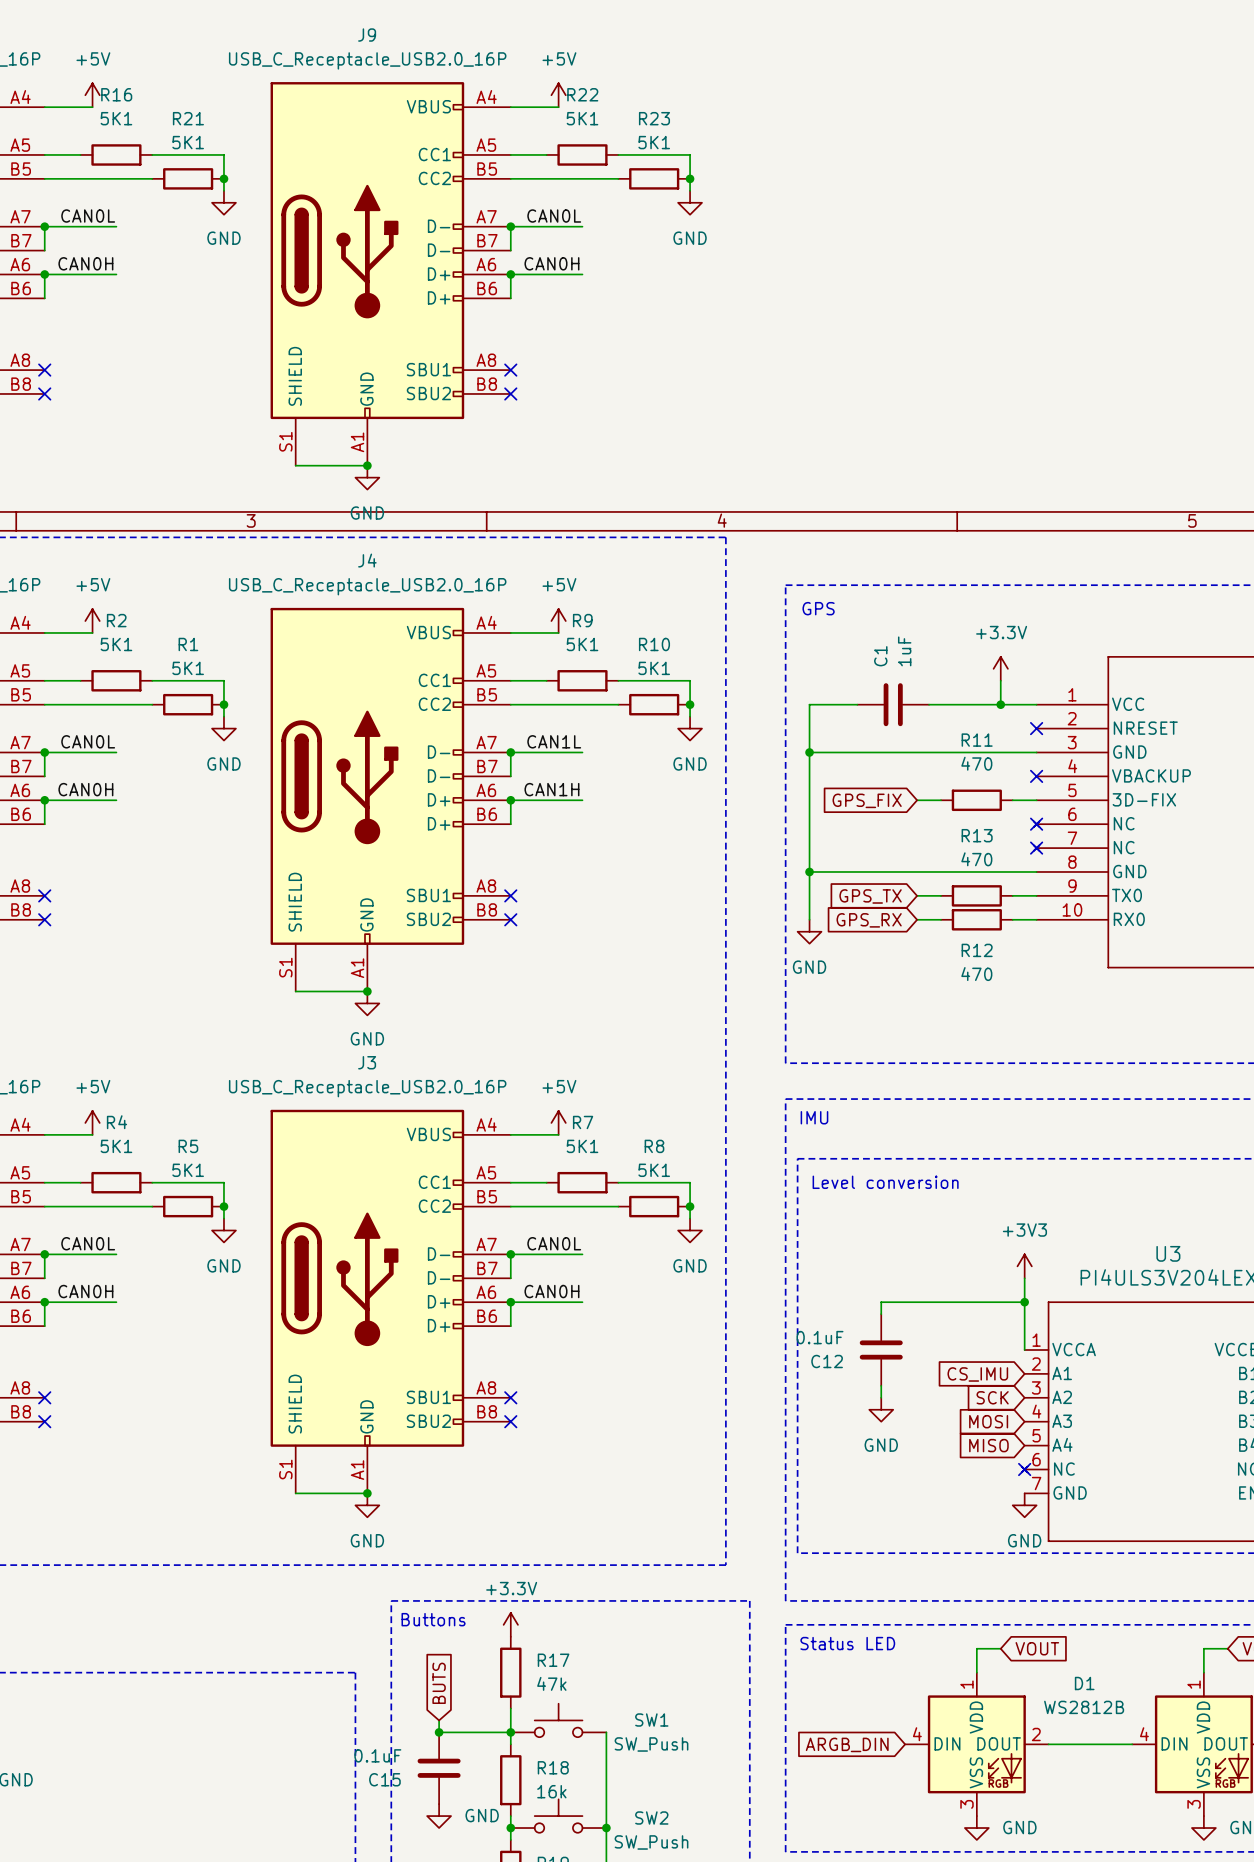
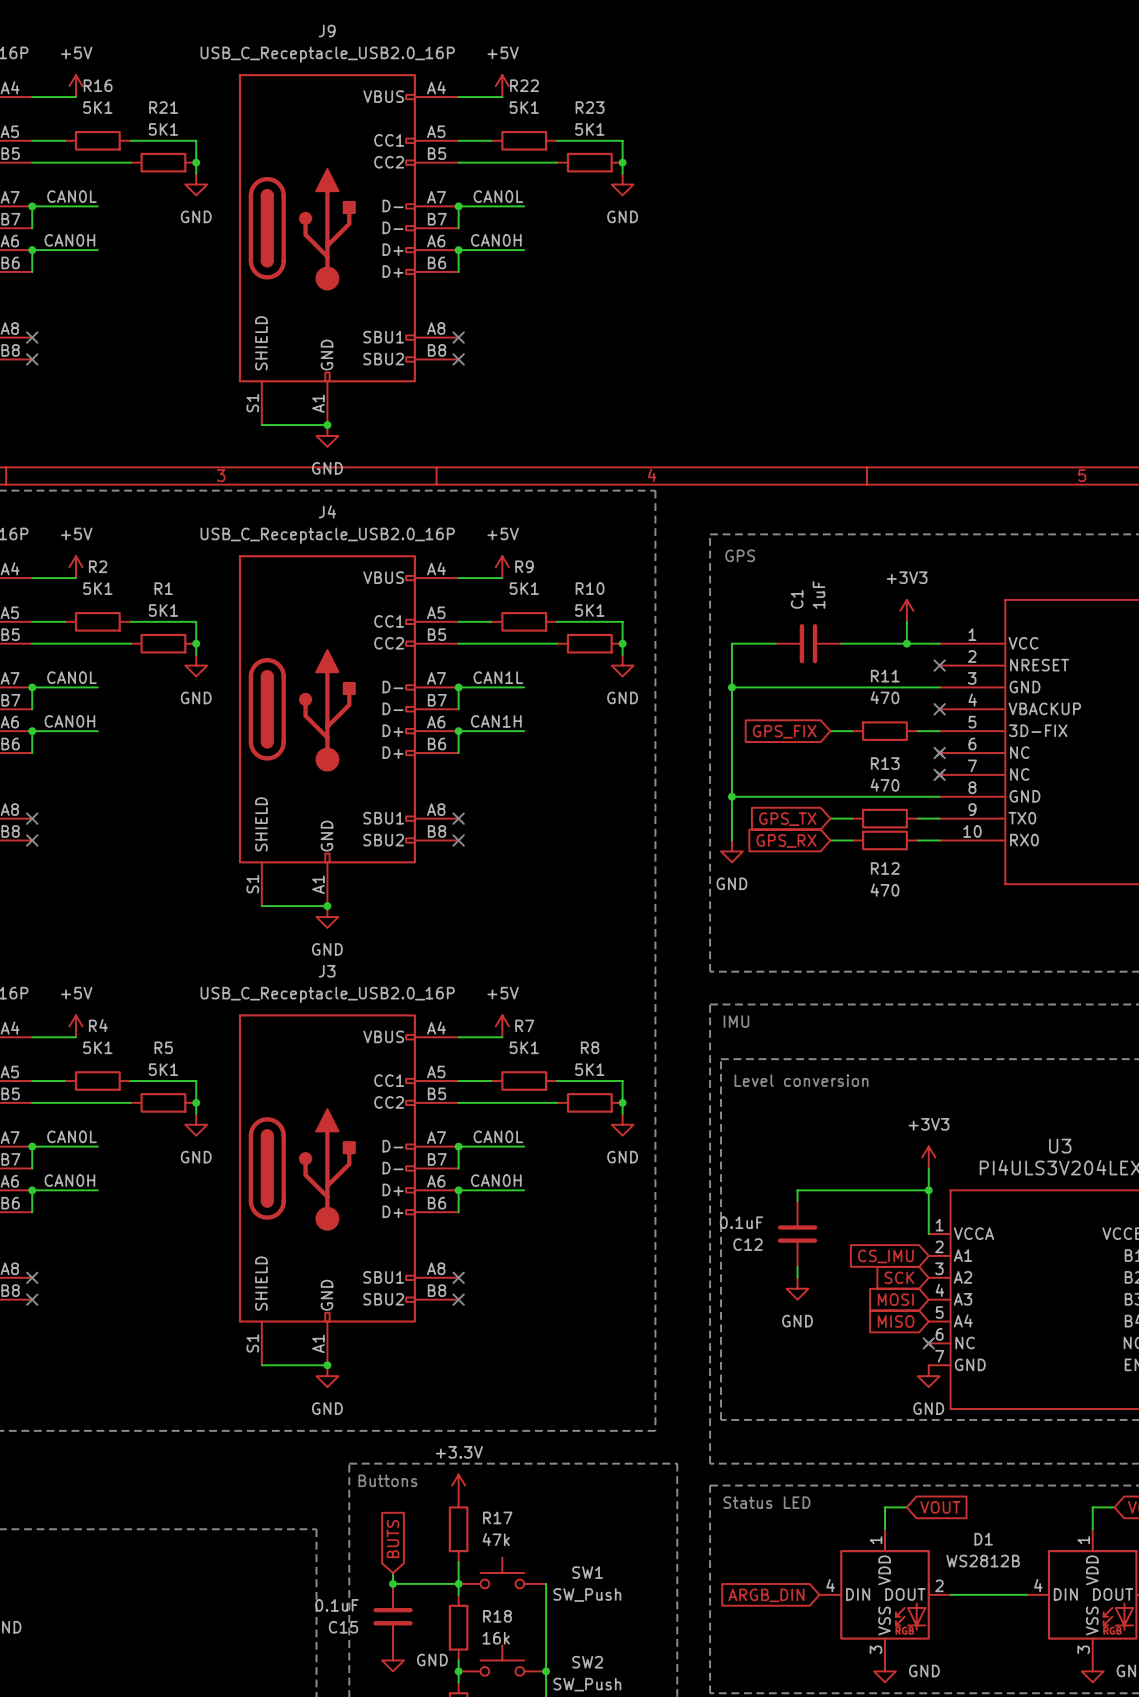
power symbol: +3.3V (1000, 668) -> +3V3 (906, 610)

